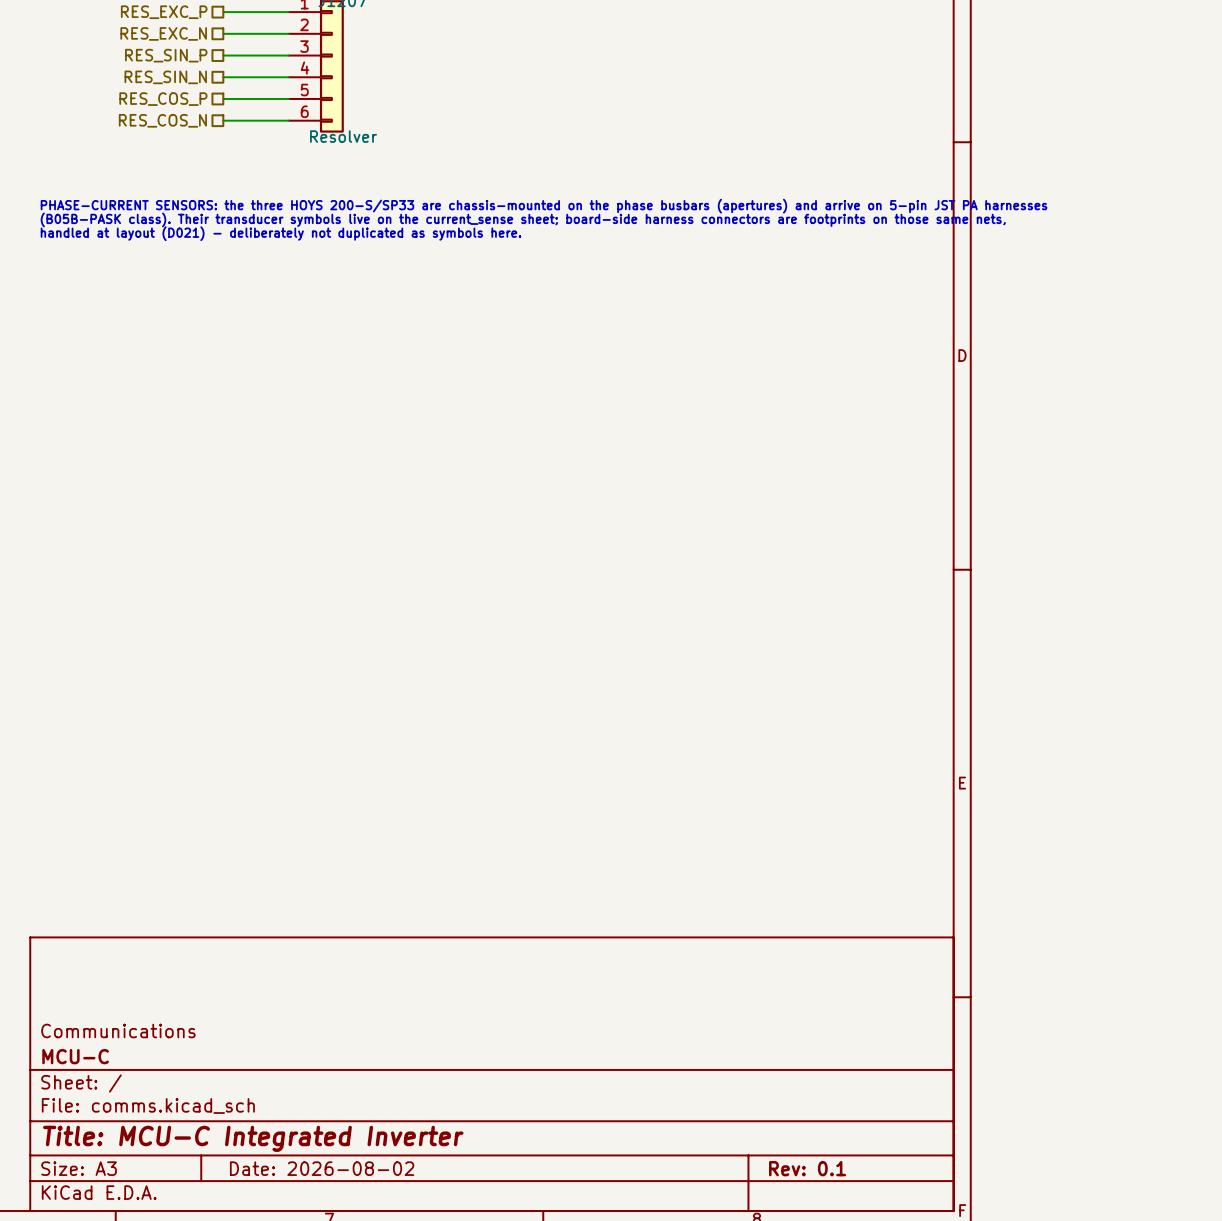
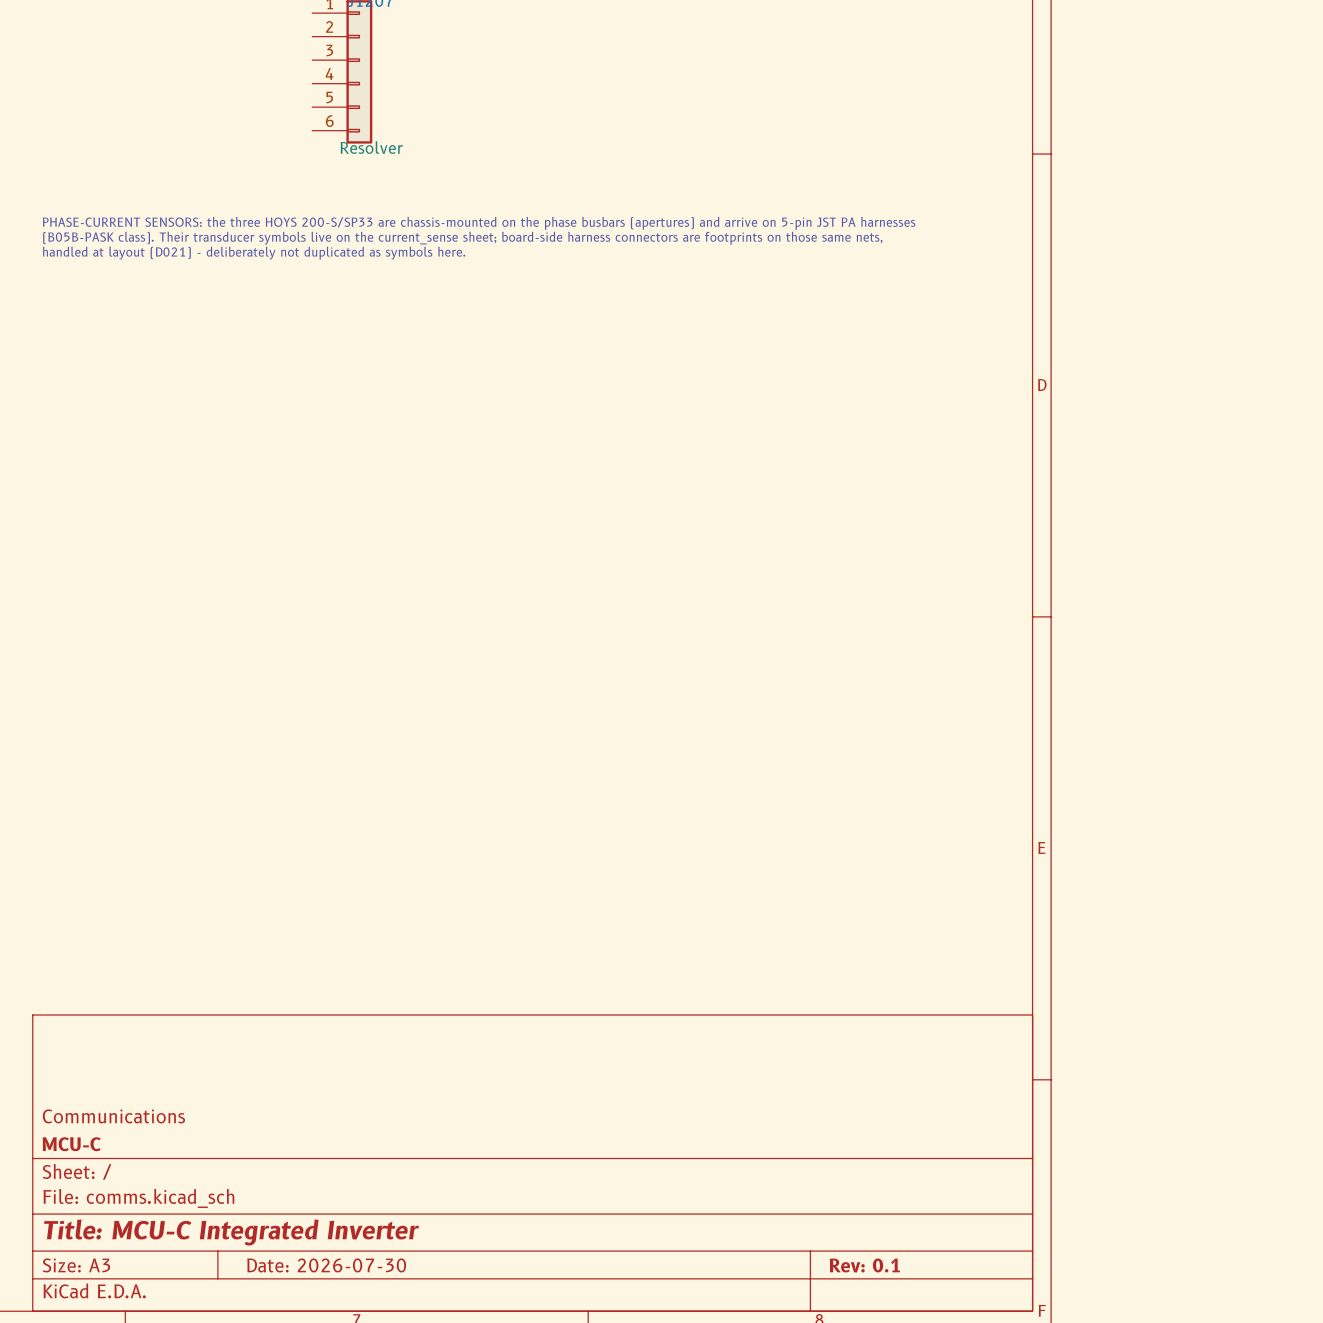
hierarchical label: RES_EXC_P (164, 12) -> none
wire: (223, 12) (288, 12) -> none
hierarchical label: RES_EXC_N (163, 33) -> none
wire: (223, 33) (288, 33) -> none
hierarchical label: RES_SIN_P (166, 55) -> none
wire: (223, 55) (288, 55) -> none
hierarchical label: RES_SIN_N (165, 77) -> none
wire: (223, 77) (288, 77) -> none
wire: (223, 98) (288, 98) -> none
hierarchical label: RES_COS_P (163, 99) -> none
hierarchical label: RES_COS_N (162, 120) -> none
wire: (223, 120) (288, 120) -> none
title block: Date: 2026-08-02 (322, 1168) -> Date: 2026-07-30 (326, 1265)

